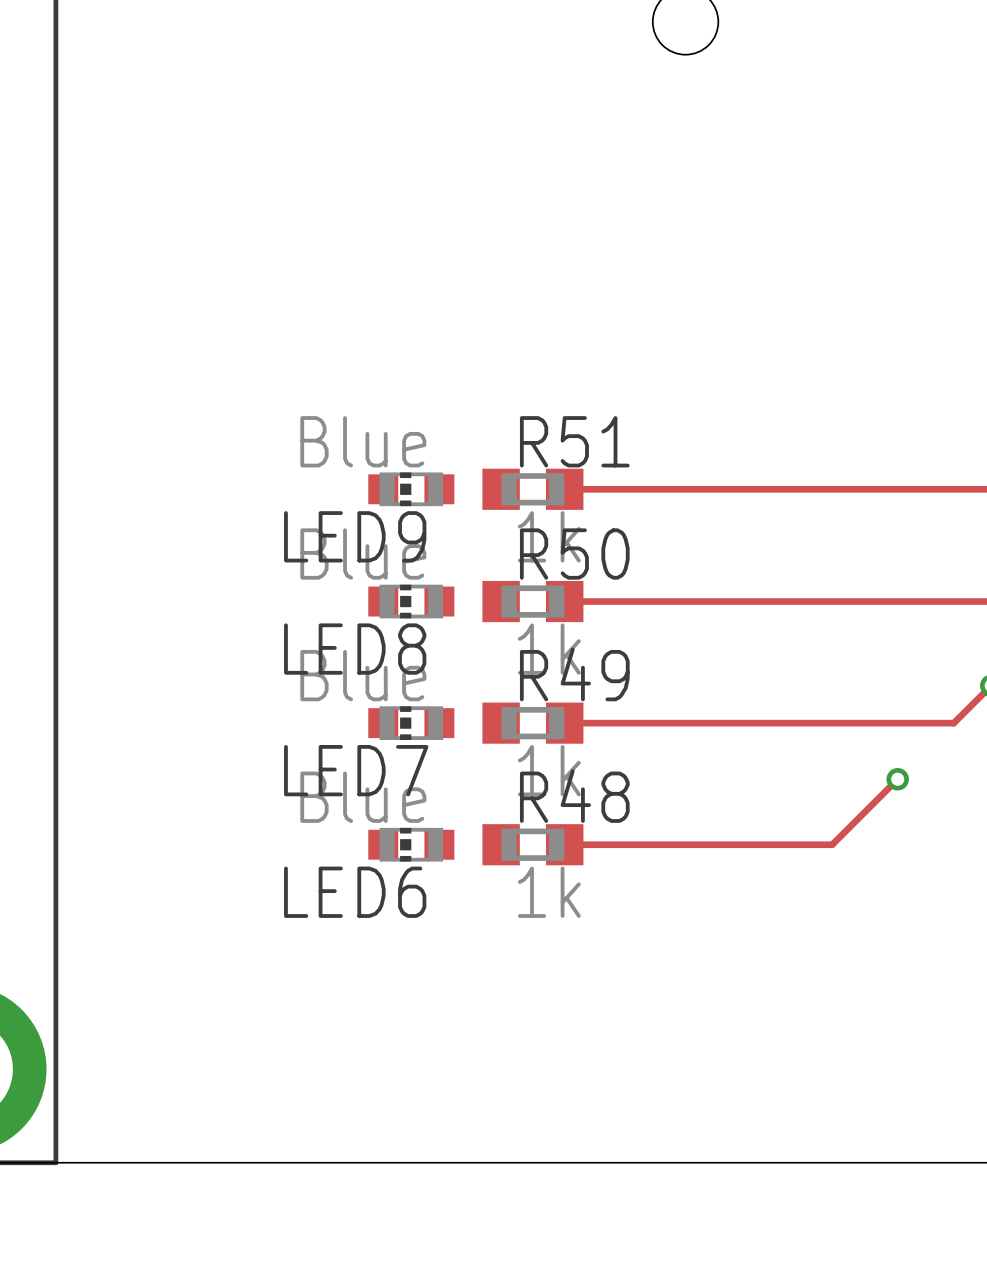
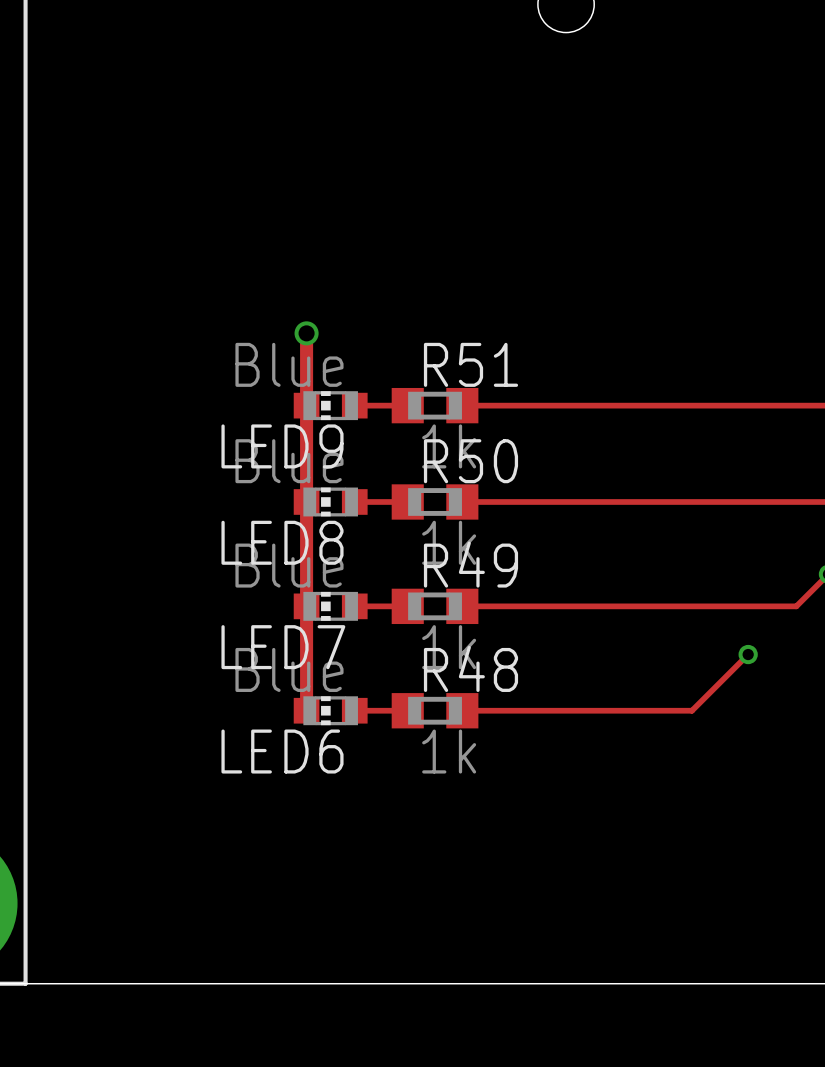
track: none -> (306, 333) (306, 710)
via: none -> (306, 333)
track: none -> (354, 405) (407, 405)
track: none -> (354, 501) (407, 501)
track: none -> (354, 606) (407, 606)
track: none -> (354, 710) (407, 710)

